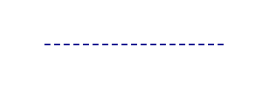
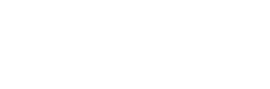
line: (44, 44) (225, 44) -> none

